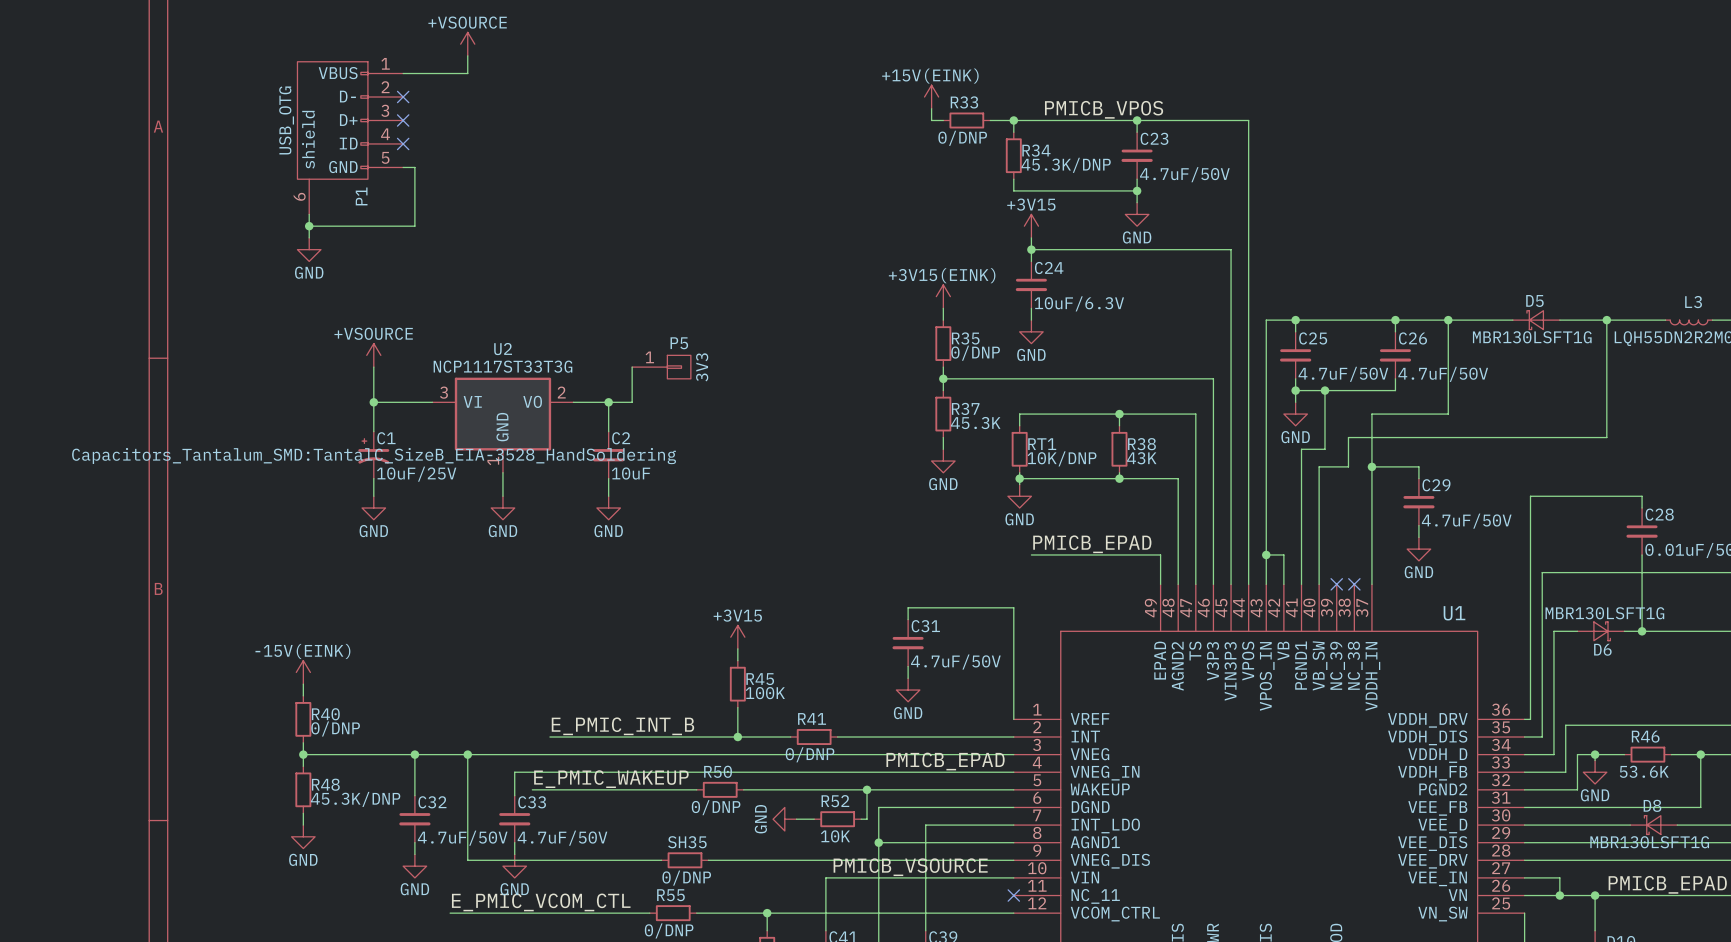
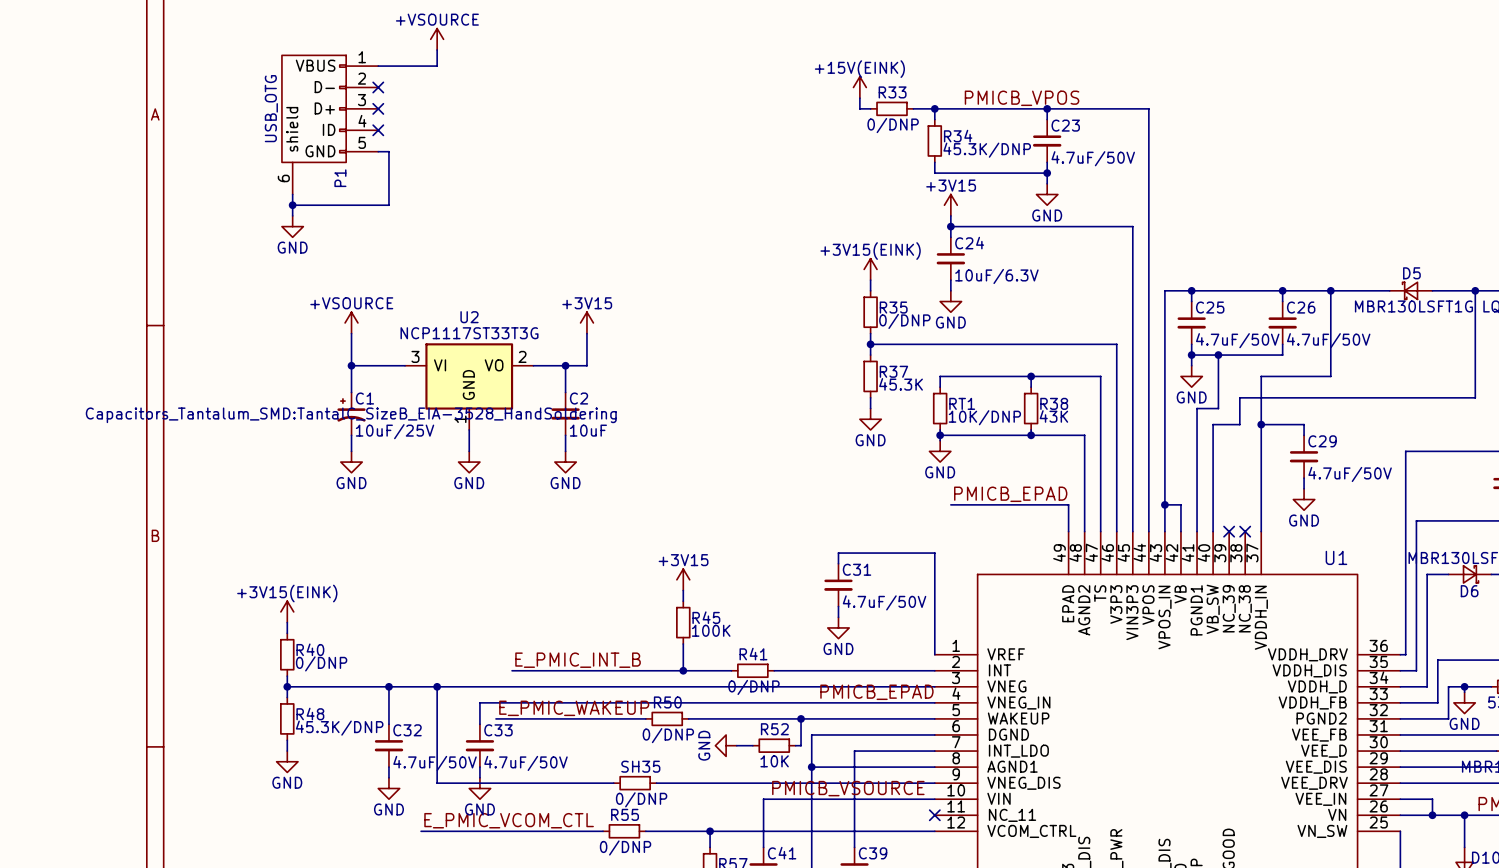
power symbol: none -> +3V15 (586, 322)
P5: 3V3 (661, 367) -> none
power symbol: -15V(EINK) (303, 672) -> +3V15(EINK) (287, 611)

